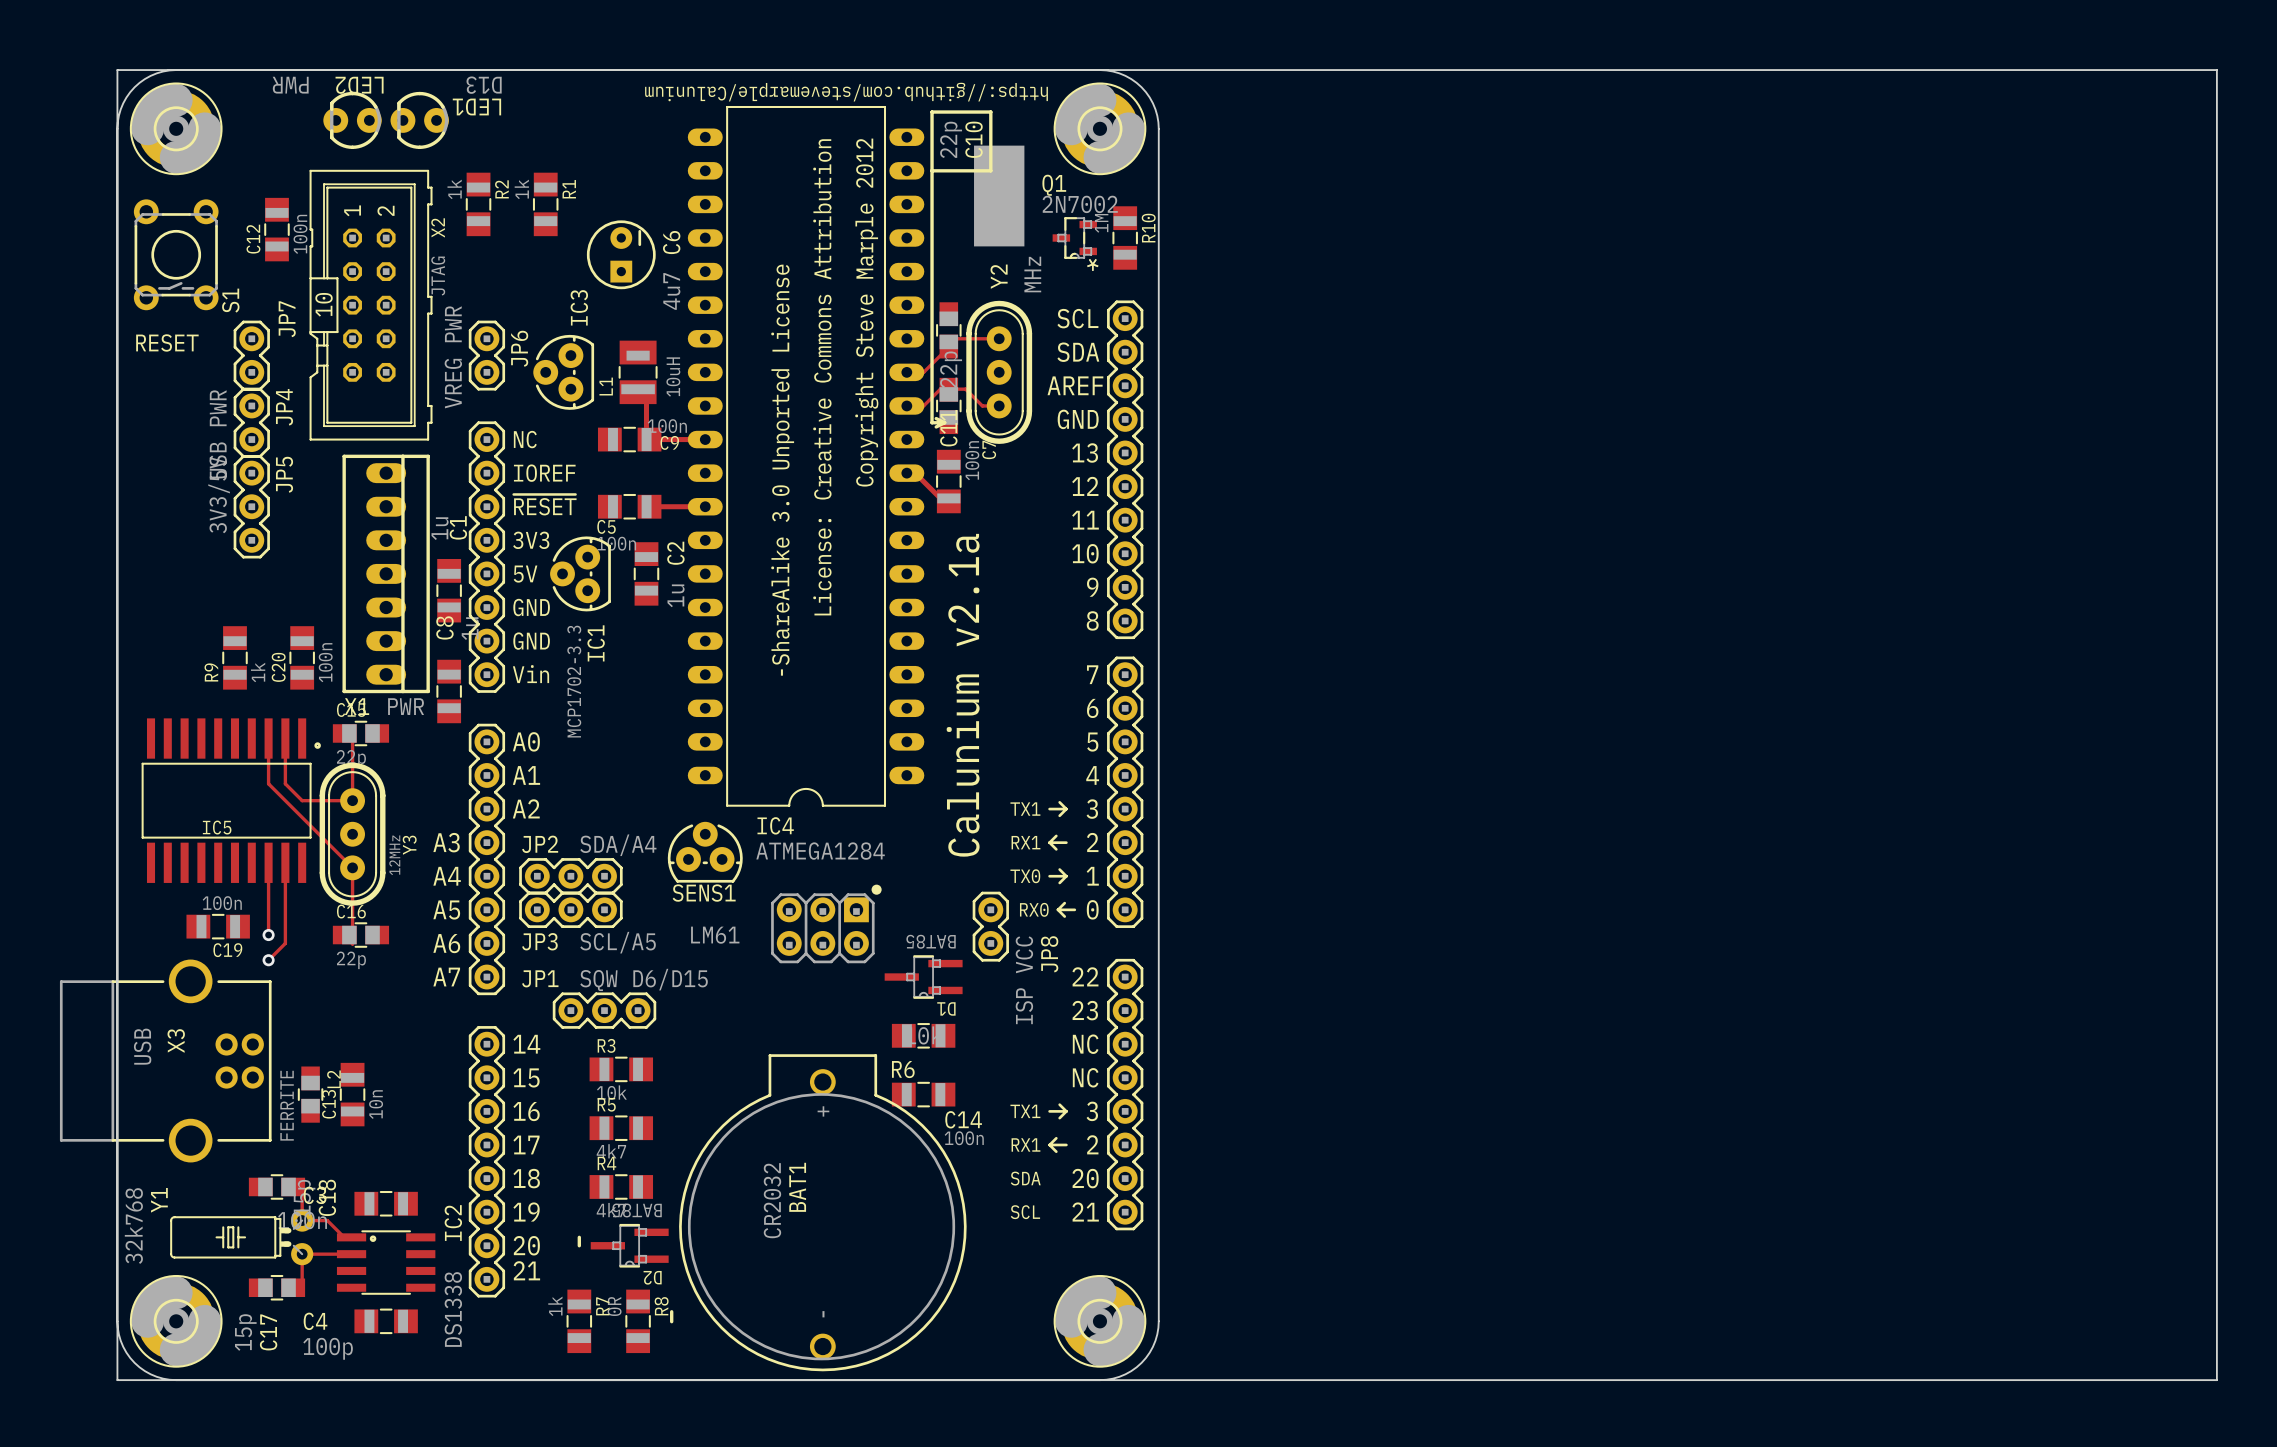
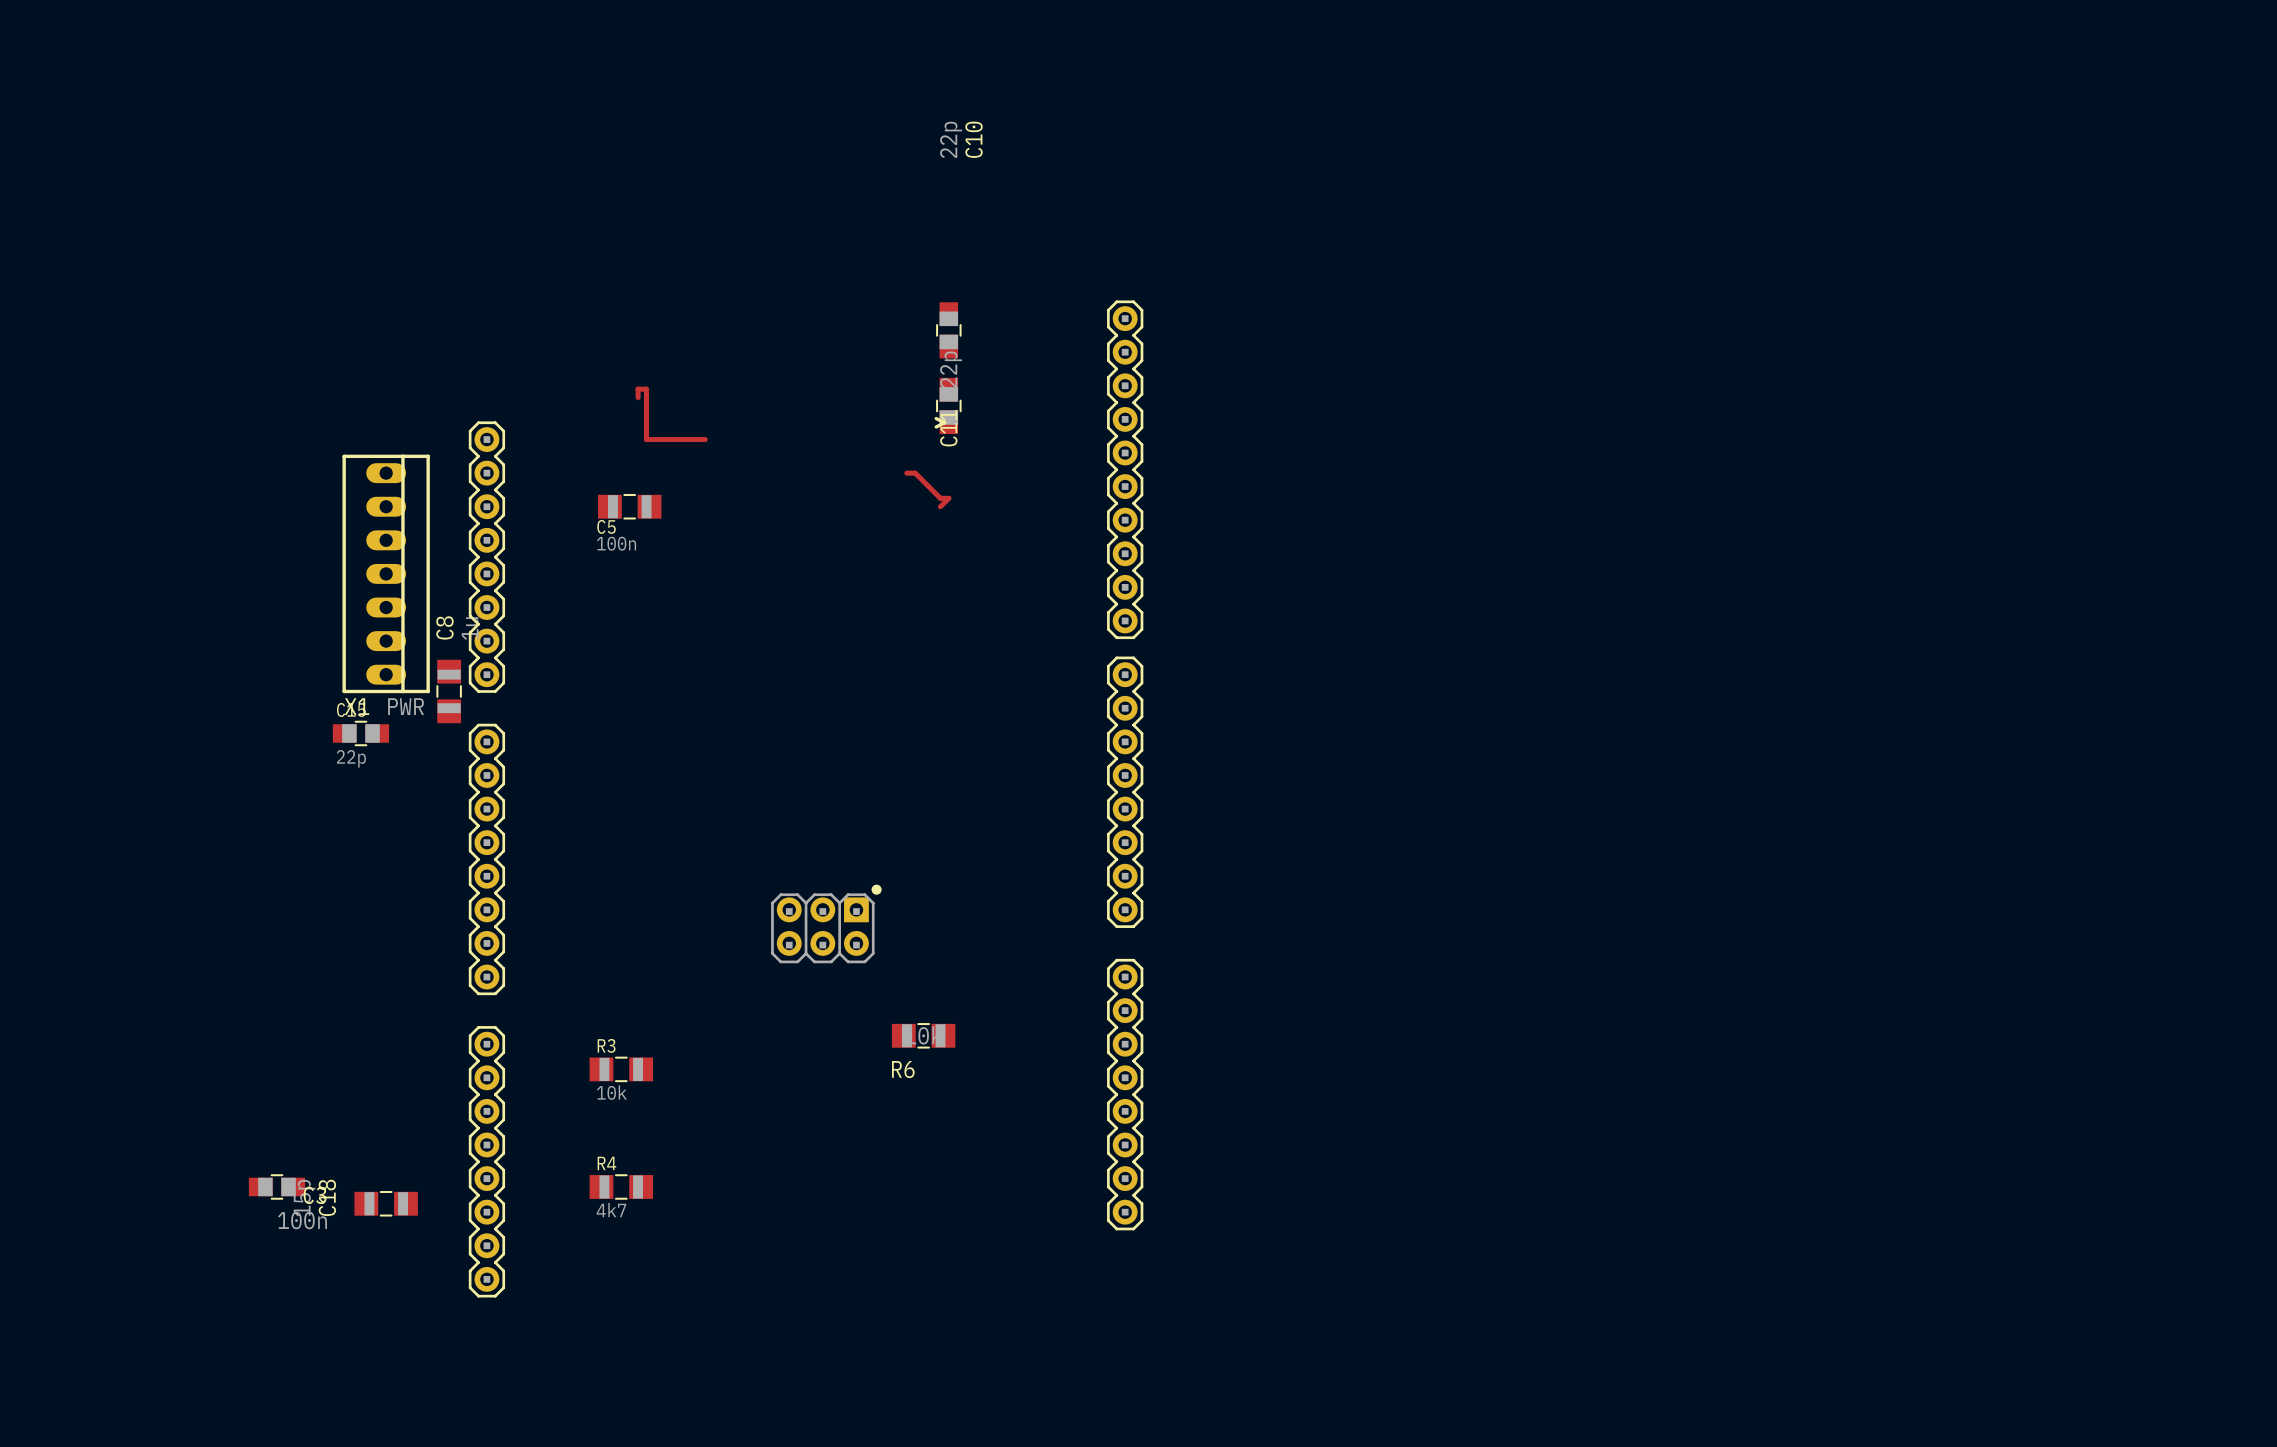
board edge: (117, 70) (117, 1380) (2216, 1380) (2216, 70) (117, 70) -> none
board edge: (176, 70) (156, 73) (134, 87) (120, 109) (117, 128) -> none
board edge: (1099, 70) (1119, 73) (1141, 87) (1155, 109) (1158, 128) (1158, 1321) (1155, 1340) (1141, 1362) (1119, 1376) (1099, 1380) -> none
text: https://github.com/stevemarple/Calunium (846, 92) -> none
LED2: PWR (352, 120) -> none
LED1: D13 (419, 120) -> none
part: (176, 128) -> none
part: (1099, 128) -> none
drawing: [974, 145, 1025, 247] -> none
line: (932, 170) (990, 170) (990, 112) (932, 112) (932, 422) (944, 422) -> none
R2: 1k (478, 204) -> none
R1: 1k (545, 204) -> none
C12: 100n (276, 229) -> none
Q1: 2N7002 (1074, 238) -> none
R10: 1M (1125, 238) -> none
S1: (176, 254) -> none
C6: 4u7 (621, 254) -> none
text: MHz (1032, 274) -> none
X2: JTAG (371, 305) -> none
text: Copyright Steve Marple 2012 (866, 312) -> none
text: SCL (1077, 318) -> none
track: (999, 338) (957, 338) (923, 372) (906, 372) -> none
text: RESET (167, 342) -> none
text: SDA (1078, 352) -> none
JP7: (251, 355) -> none
JP6: VREG PWR (486, 355) -> none
IC3: (563, 372) -> none
L1: 10uH (638, 372) -> none
Y2: (999, 372) -> none
text: License: Creative Commons Attribution (822, 377) -> none
text: AREF (1075, 385) -> none
track: (906, 405) (923, 405) (940, 389) (965, 389) (982, 405) (999, 405) -> none
text: GND (1078, 419) -> none
JP4: USB PWR (251, 422) -> none
text: NC (525, 439) -> none
C9: 100n (629, 439) -> none
text: 13 (1085, 452) -> none
IC4: ATMEGA1284 (806, 456) -> none
text: -ShareAlike 3.0 Unported License (782, 470) -> none
text: IOREF (544, 473) -> none
C7: 100n (948, 481) -> none
text: 12 (1085, 486) -> none
text: ~{RESET} (545, 504) -> none
JP5: 3V3/5V (251, 506) -> none
track: (646, 506) (705, 506) -> none
text: 11 (1085, 520) -> none
text: 3V3 (531, 540) -> none
text: 10 (1085, 553) -> none
IC1: MCP1702-3.3 (580, 573) -> none
C2: 1u (646, 573) -> none
text: 5V (525, 574) -> none
text: 9 (1092, 587) -> none
C1: 1u (449, 590) -> none
text: GND (531, 607) -> none
text: 8 (1092, 620) -> none
text: GND (531, 641) -> none
R9: 1k (234, 657) -> none
C20: 100n (302, 657) -> none
text: Vin (531, 674) -> none
text: 7 (1092, 674) -> none
text: Calunium v2.1a (963, 695) -> none
text: 6 (1092, 708) -> none
track: (344, 733) (352, 732) (352, 800) (302, 800) (285, 783) (285, 738) -> none
track: (268, 738) (268, 783) (352, 867) (352, 944) (344, 935) -> none
text: A0 (526, 741) -> none
text: 5 (1092, 742) -> none
text: A1 (526, 775) -> none
text: 4 (1092, 775) -> none
IC5: (231, 800) -> none
line: (1059, 802) (1066, 809) -> none
text: A2 (526, 808) -> none
text: TX1 (1025, 809) -> none
line: (1049, 809) (1066, 809) -> none
line: (1066, 809) (1059, 815) -> none
text: 3 (1092, 809) -> none
Y3: 12MHz (352, 834) -> none
line: (1056, 835) (1049, 842) -> none
text: A3 (446, 842) -> none
text: RX1 (1025, 842) -> none
line: (1049, 842) (1066, 842) -> none
line: (1049, 842) (1056, 849) -> none
text: 2 (1092, 842) -> none
SENS1: LM61 (705, 852) -> none
track: (268, 862) (268, 935) -> none
track: (285, 862) (285, 943) (268, 960) -> none
line: (1059, 869) (1066, 876) -> none
text: A4 (447, 876) -> none
JP2: SDA/A4 (570, 876) -> none
text: TX0 (1025, 876) -> none
line: (1049, 876) (1066, 876) -> none
line: (1066, 876) (1059, 882) -> none
text: 1 (1092, 876) -> none
line: (1064, 903) (1057, 909) -> none
JP3: SCL/A5 (570, 909) -> none
text: RX0 (1034, 909) -> none
line: (1057, 909) (1074, 909) -> none
line: (1057, 909) (1064, 916) -> none
text: 0 (1092, 909) -> none
text: A5 (446, 910) -> none
C19: 100n (218, 926) -> none
JP8: ISP VCC (990, 926) -> none
via: (268, 935) -> none
C16: 22p (360, 935) -> none
text: A6 (446, 943) -> none
via: (268, 960) -> none
text: 22 (1085, 976) -> none
text: A7 (446, 977) -> none
D1: BAT85 (923, 977) -> none
JP1: SQW D6/D15 (604, 1010) -> none
text: 23 (1085, 1010) -> none
text: 14 (526, 1044) -> none
text: NC (1085, 1044) -> none
X3: USB (165, 1061) -> none
text: 15 (526, 1077) -> none
text: NC (1085, 1077) -> none
L2: FERRITE (310, 1094) -> none
C13: 10n (352, 1094) -> none
C14: 100n (923, 1094) -> none
line: (1059, 1104) (1066, 1111) -> none
text: 16 (526, 1111) -> none
text: TX1 (1025, 1111) -> none
line: (1049, 1111) (1066, 1111) -> none
line: (1066, 1111) (1059, 1118) -> none
text: 3 (1092, 1111) -> none
R5: 4k7 (621, 1128) -> none
line: (1056, 1138) (1049, 1144) -> none
text: 17 (526, 1144) -> none
text: RX1 (1025, 1144) -> none
line: (1049, 1144) (1066, 1144) -> none
line: (1049, 1144) (1056, 1151) -> none
text: 2 (1092, 1144) -> none
text: 18 (526, 1178) -> none
text: SDA (1025, 1178) -> none
text: 20 (1085, 1178) -> none
track: (293, 1186) (302, 1186) (302, 1220) (327, 1220) (344, 1237) (352, 1237) -> none
text: 19 (526, 1212) -> none
BAT1: CR2032 (822, 1212) -> none
text: SCL (1025, 1212) -> none
text: 21 (1085, 1212) -> none
Y1: 32k768 (241, 1237) -> none
line: (579, 1237) (579, 1245) -> none
text: 20 (526, 1245) -> none
D2: BAT85 (629, 1245) -> none
track: (352, 1254) (302, 1254) (302, 1287) (293, 1287) -> none
IC2: DS1338 (386, 1262) -> none
text: 21 (526, 1270) -> none
C17: 15p (276, 1287) -> none
line: (671, 1311) (671, 1321) -> none
board edge: (117, 1321) (120, 1340) (134, 1362) (156, 1376) (176, 1380) -> none
part: (176, 1321) -> none
C4: 100p (386, 1321) -> none
R7: 1k (579, 1321) -> none
R8: 0R (638, 1321) -> none
part: (1099, 1321) -> none

